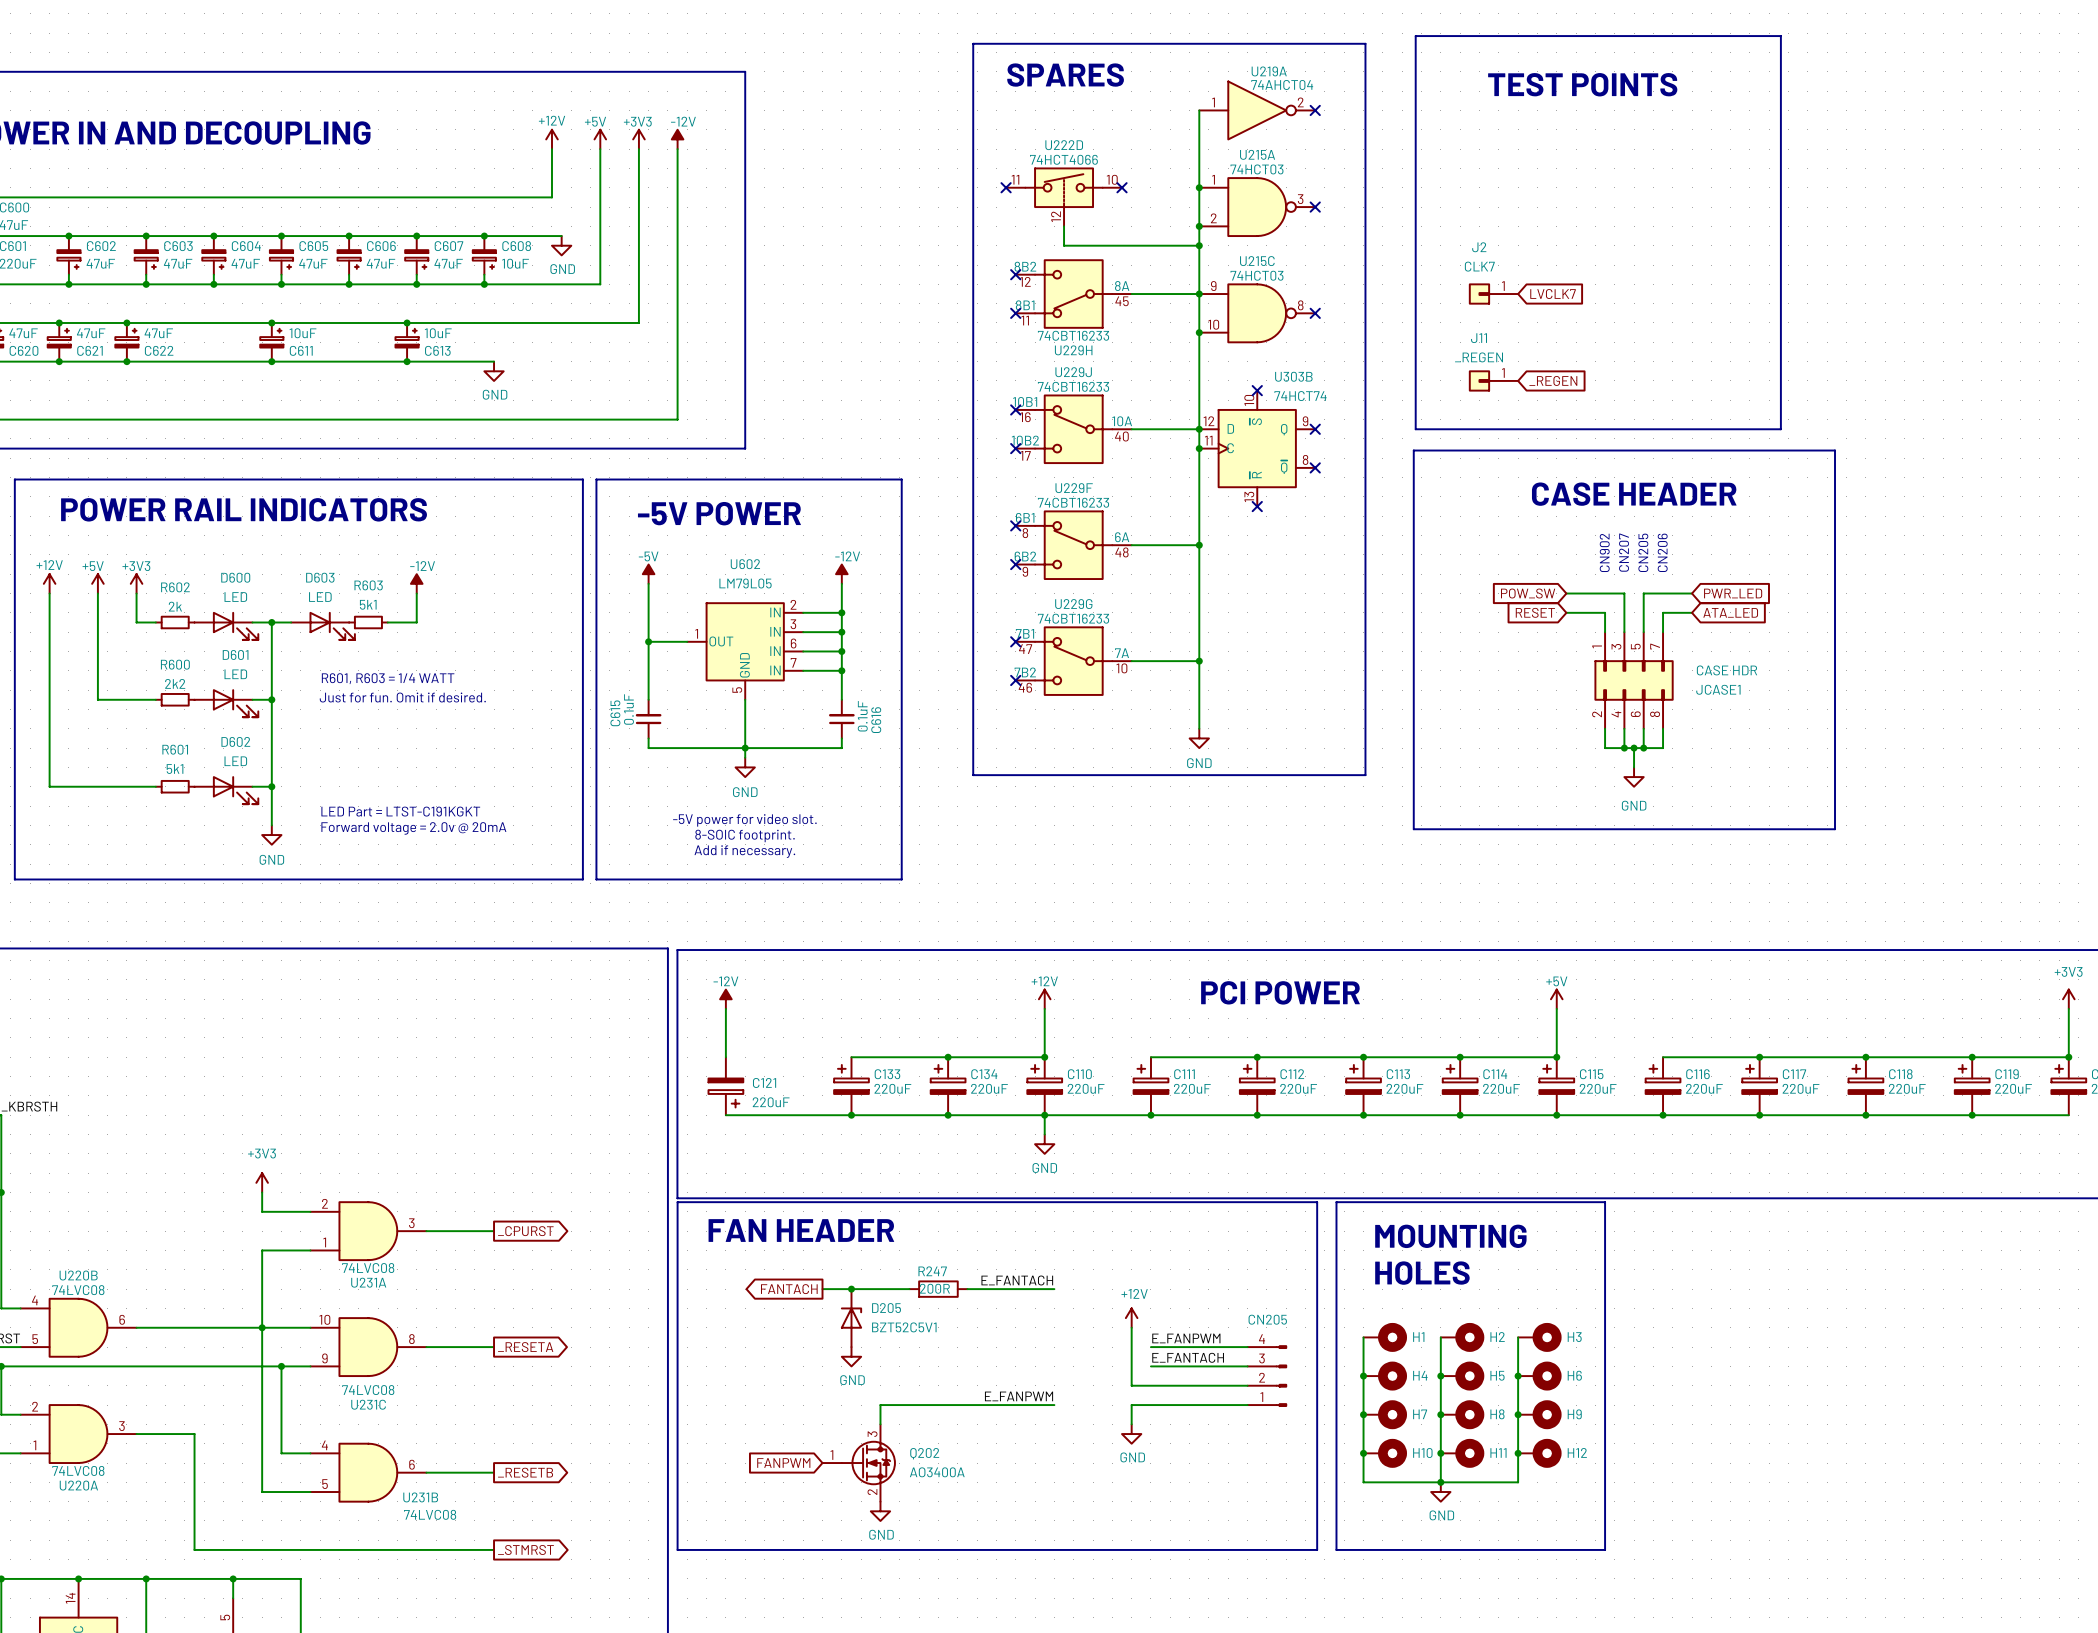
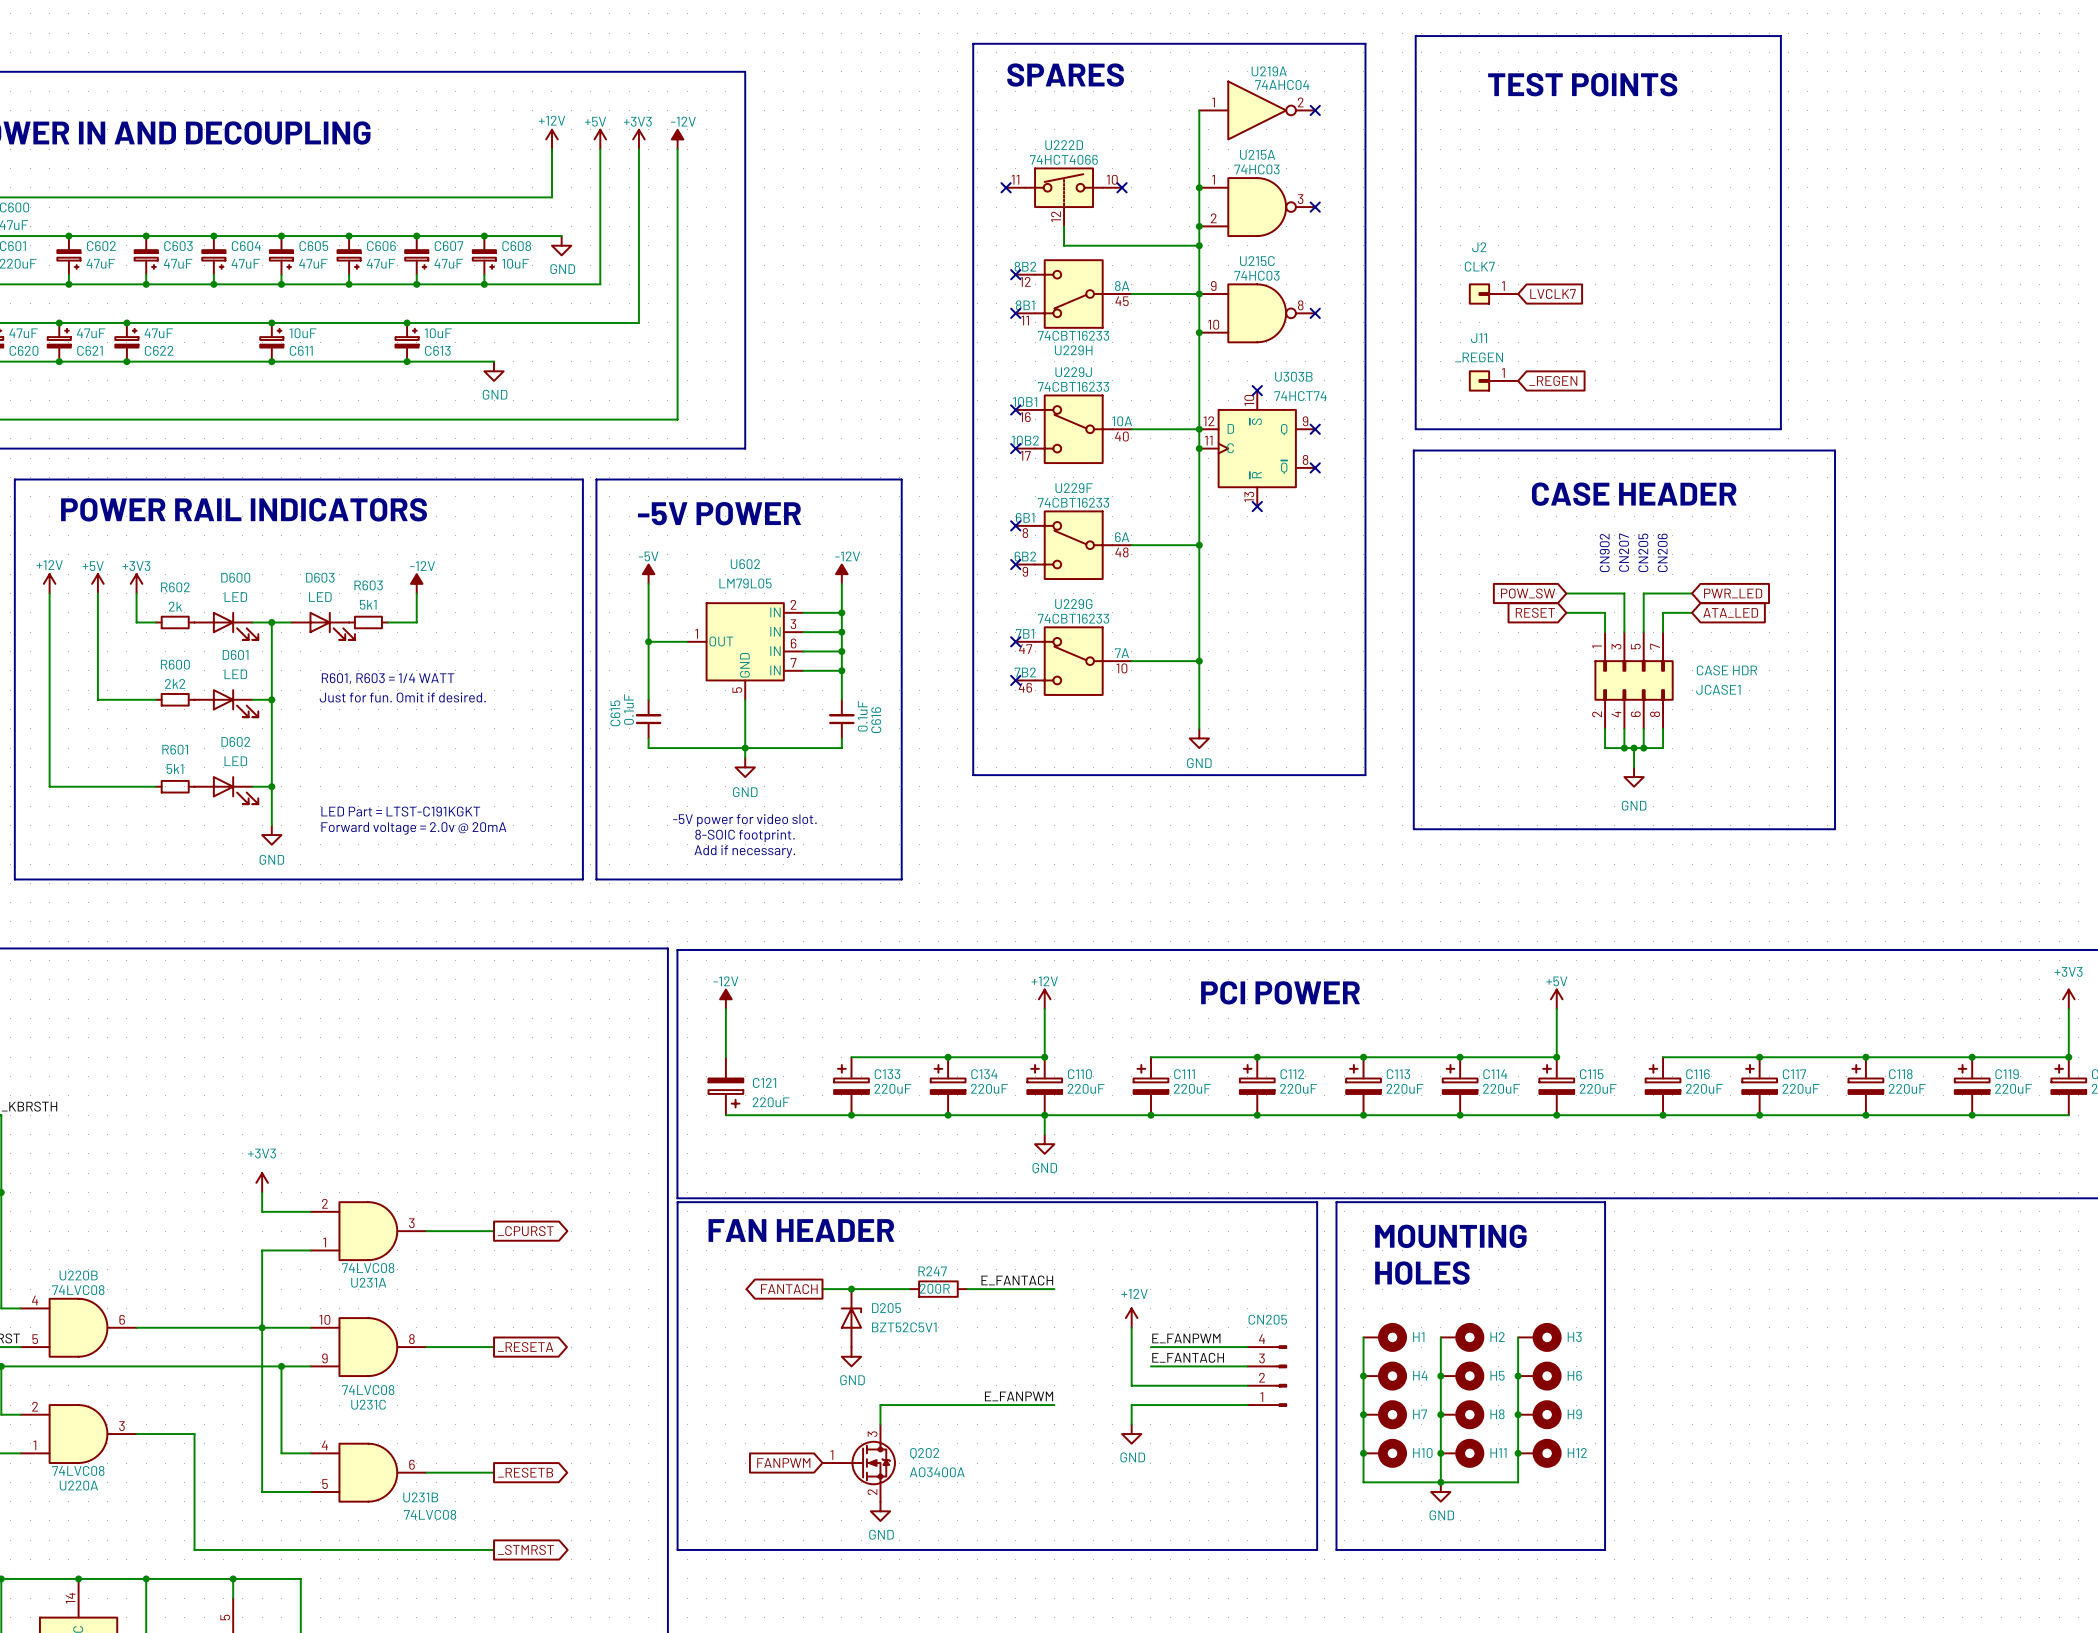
U219A value: 74AHCT04 (1282, 84) -> 74AHC04 (1282, 84)
U215A value: 74HCT03 (1257, 169) -> 74HC03 (1257, 169)
U215C value: 74HCT03 (1257, 275) -> 74HC03 (1257, 275)

